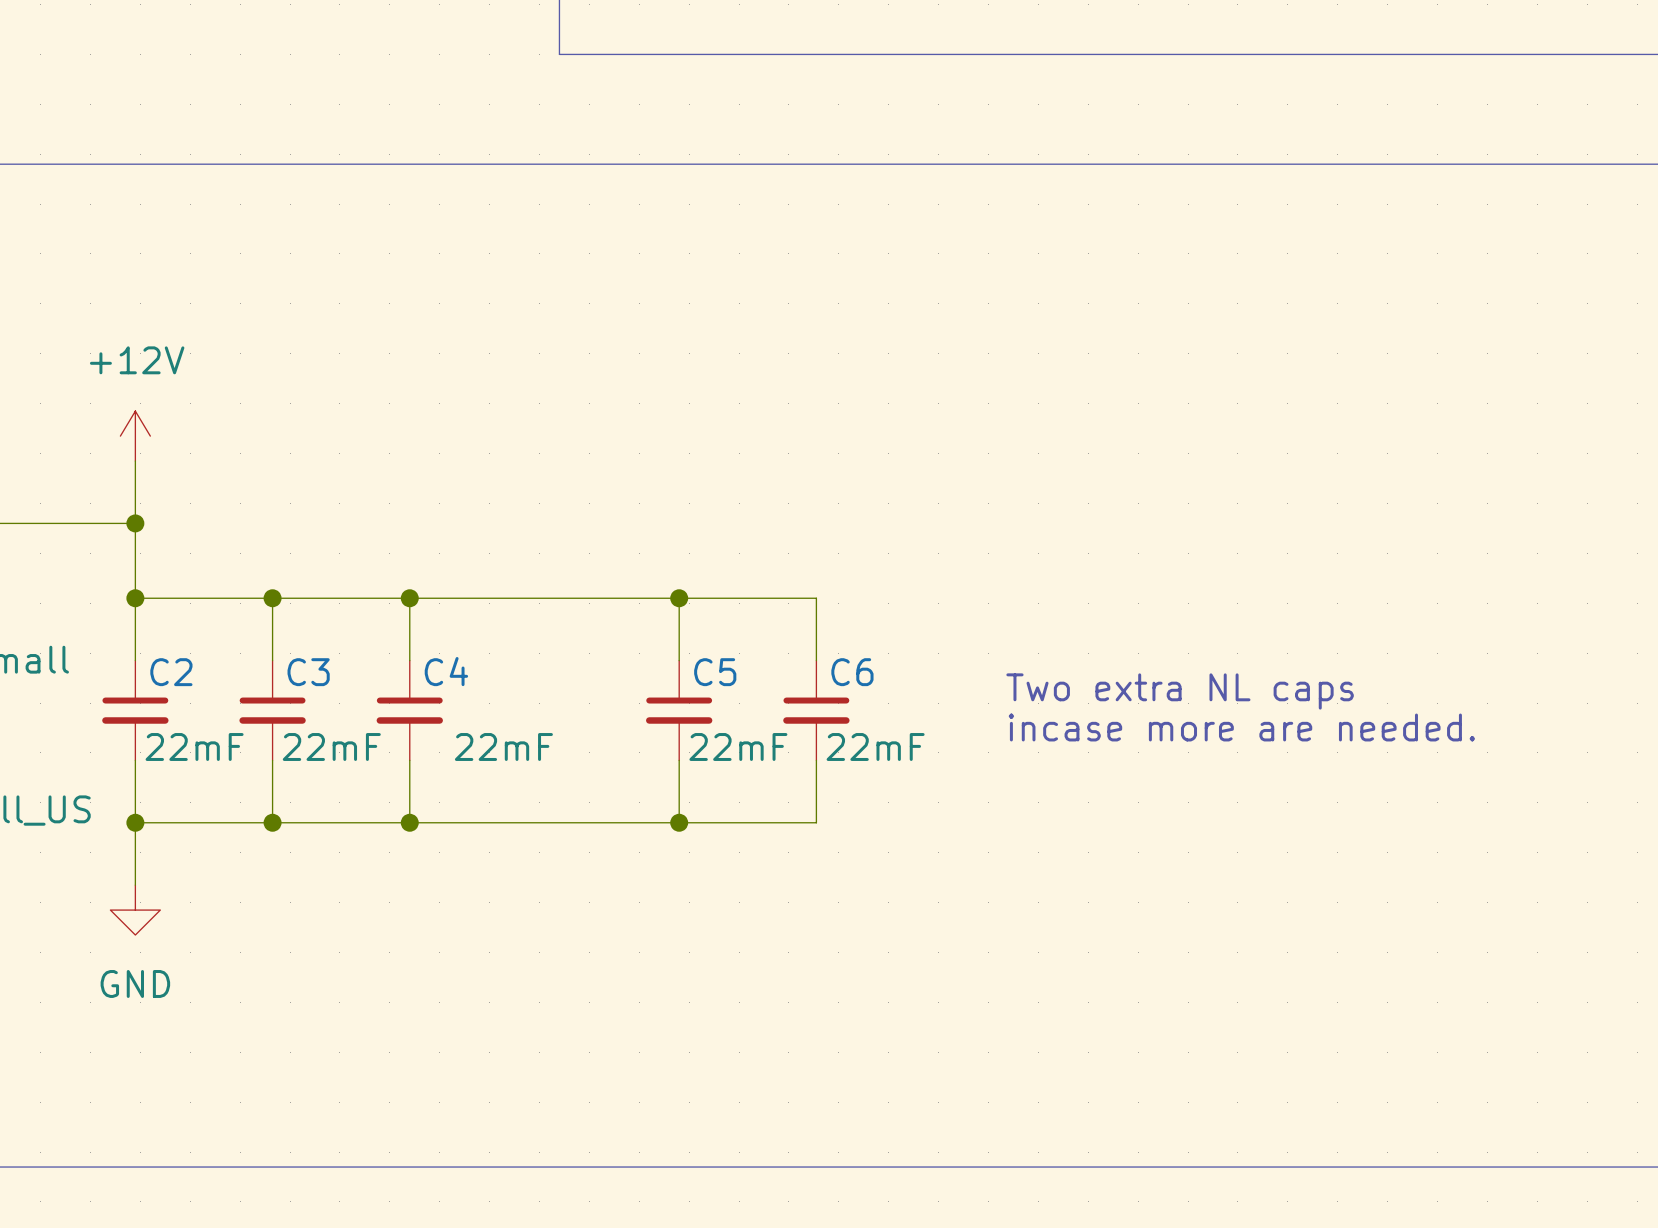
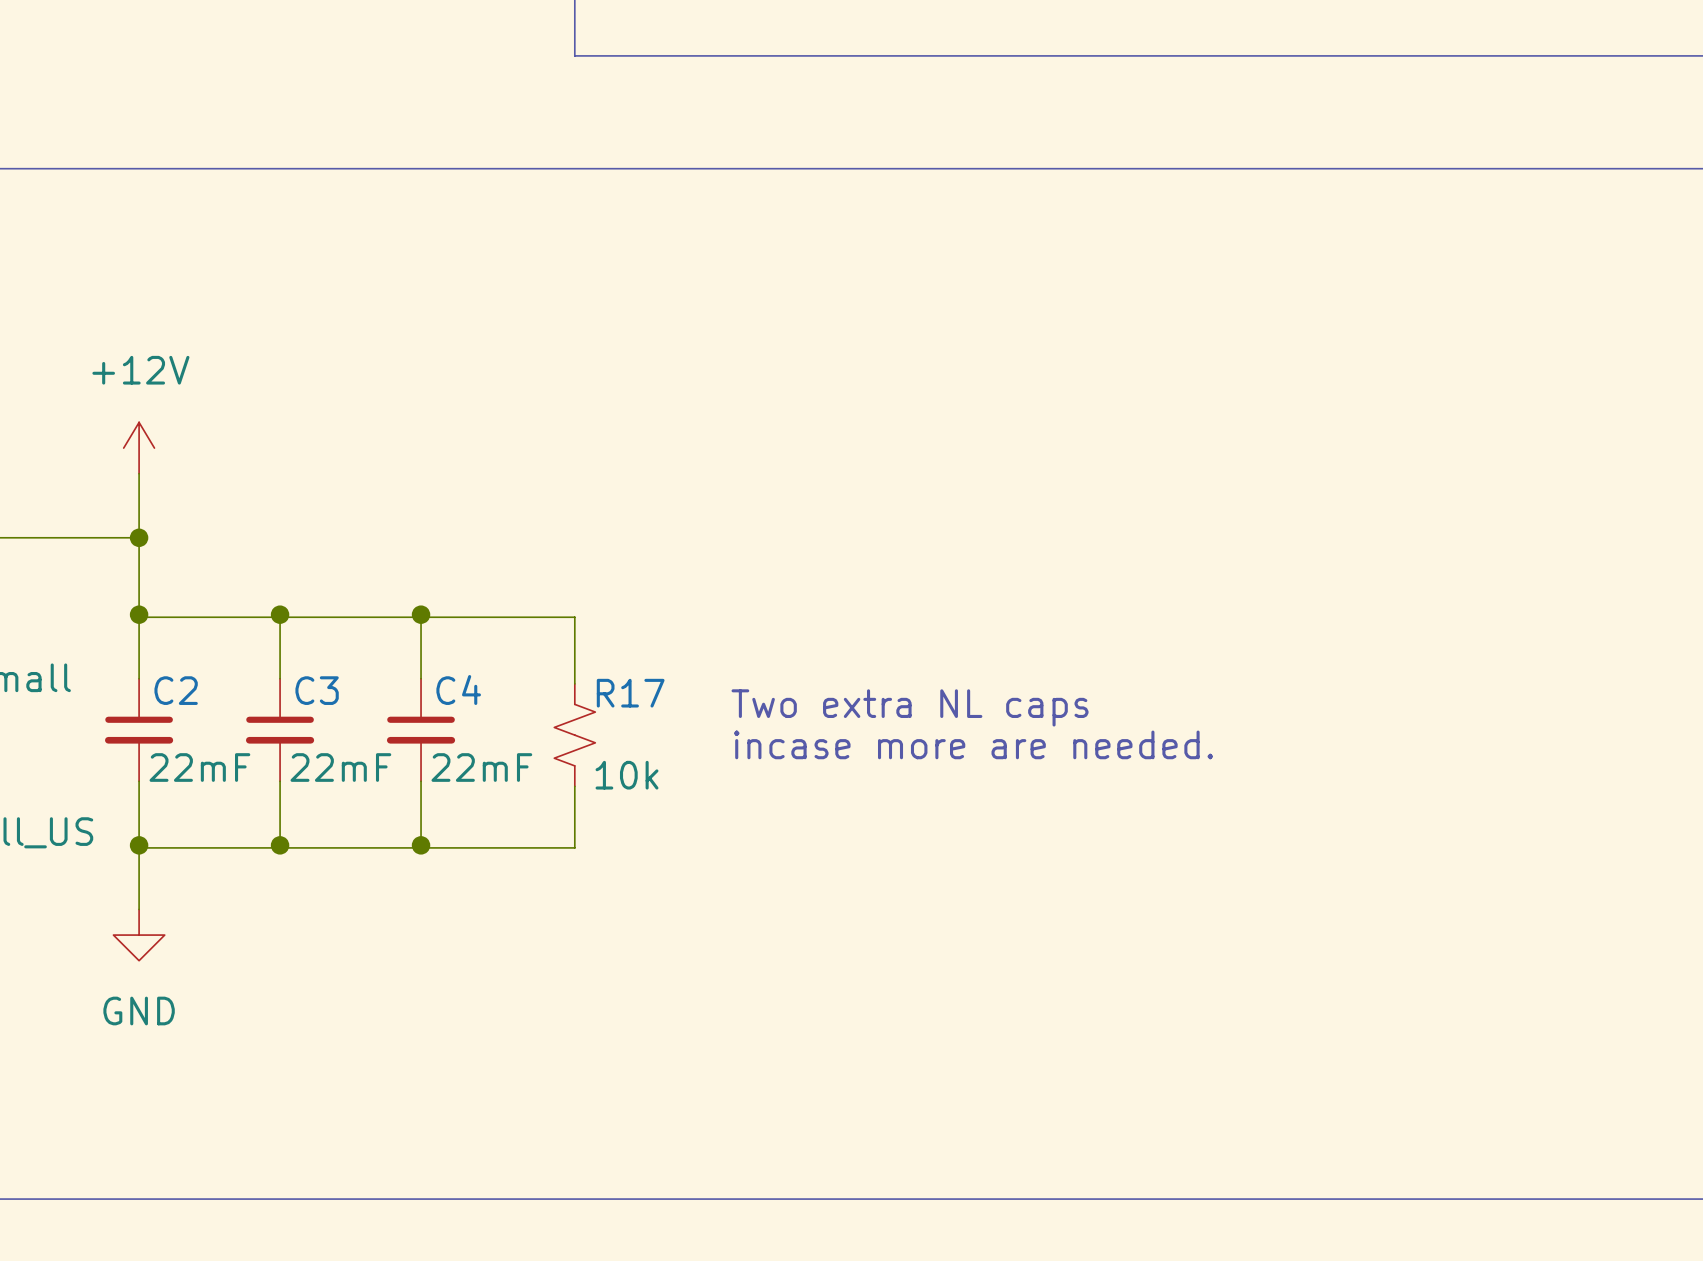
wire: (135, 598) (816, 598) (816, 660) -> none
wire: (679, 598) (679, 660) -> none
junction: (679, 598) -> none
wire: none -> (139, 617) (574, 617) (574, 683)
text position: Two extra NL caps (1180, 691) -> Two extra NL caps (910, 707)
C5: 22mF (679, 710) -> none
C6: 22mF (816, 710) -> none
R17: none -> 10k (574, 735)
text position: incase more are needed. (1241, 727) -> incase more are needed. (973, 744)
C4 value position: 22mF (503, 746) -> 22mF (481, 767)
wire: (679, 760) (679, 822) -> none
wire: (816, 760) (816, 822) (135, 822) -> none
wire: none -> (574, 786) (574, 847) (139, 847)
junction: (679, 822) -> none

